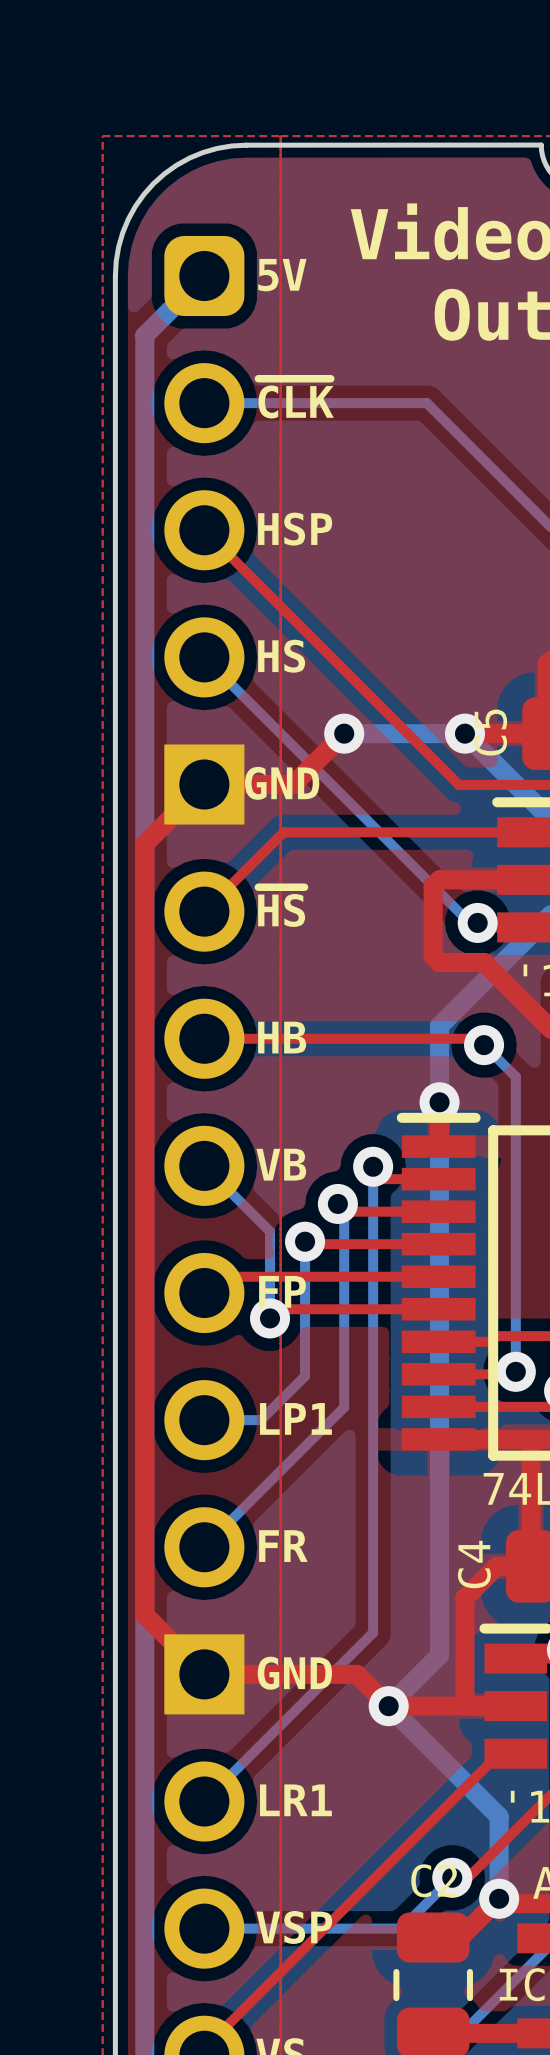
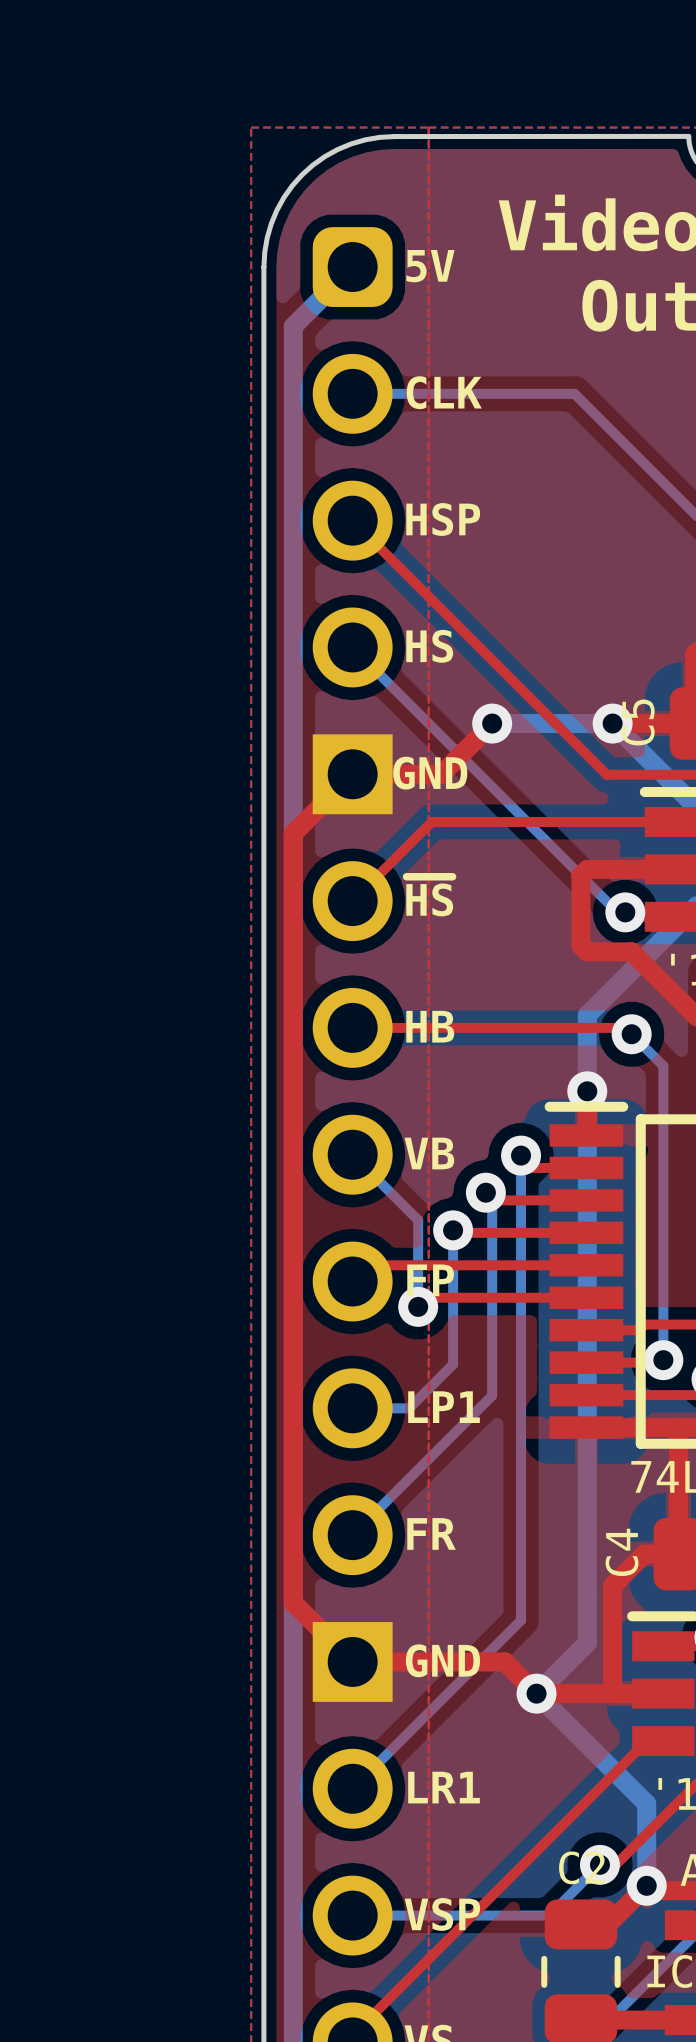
text: ~{CLK} (296, 398) -> CLK (444, 392)

